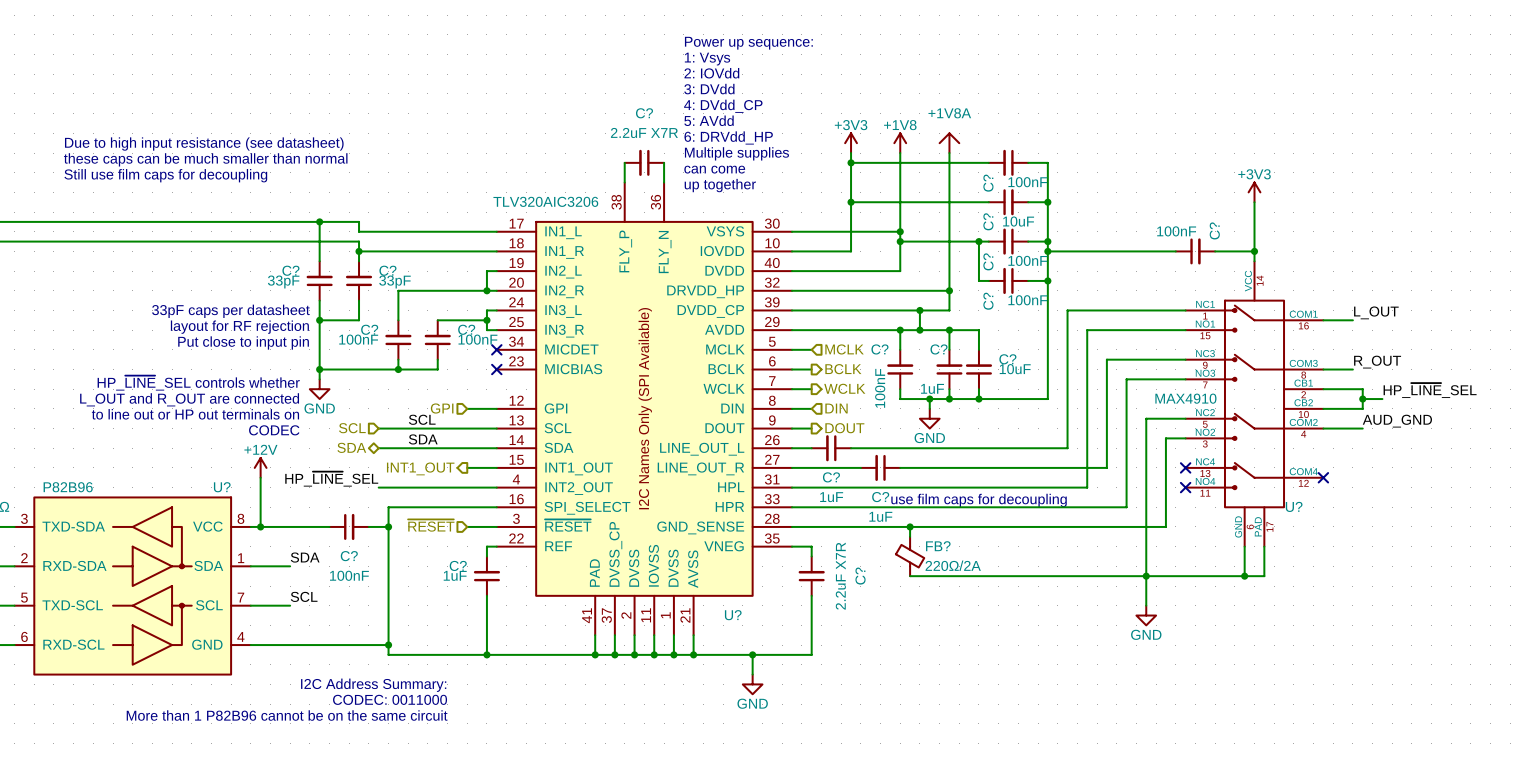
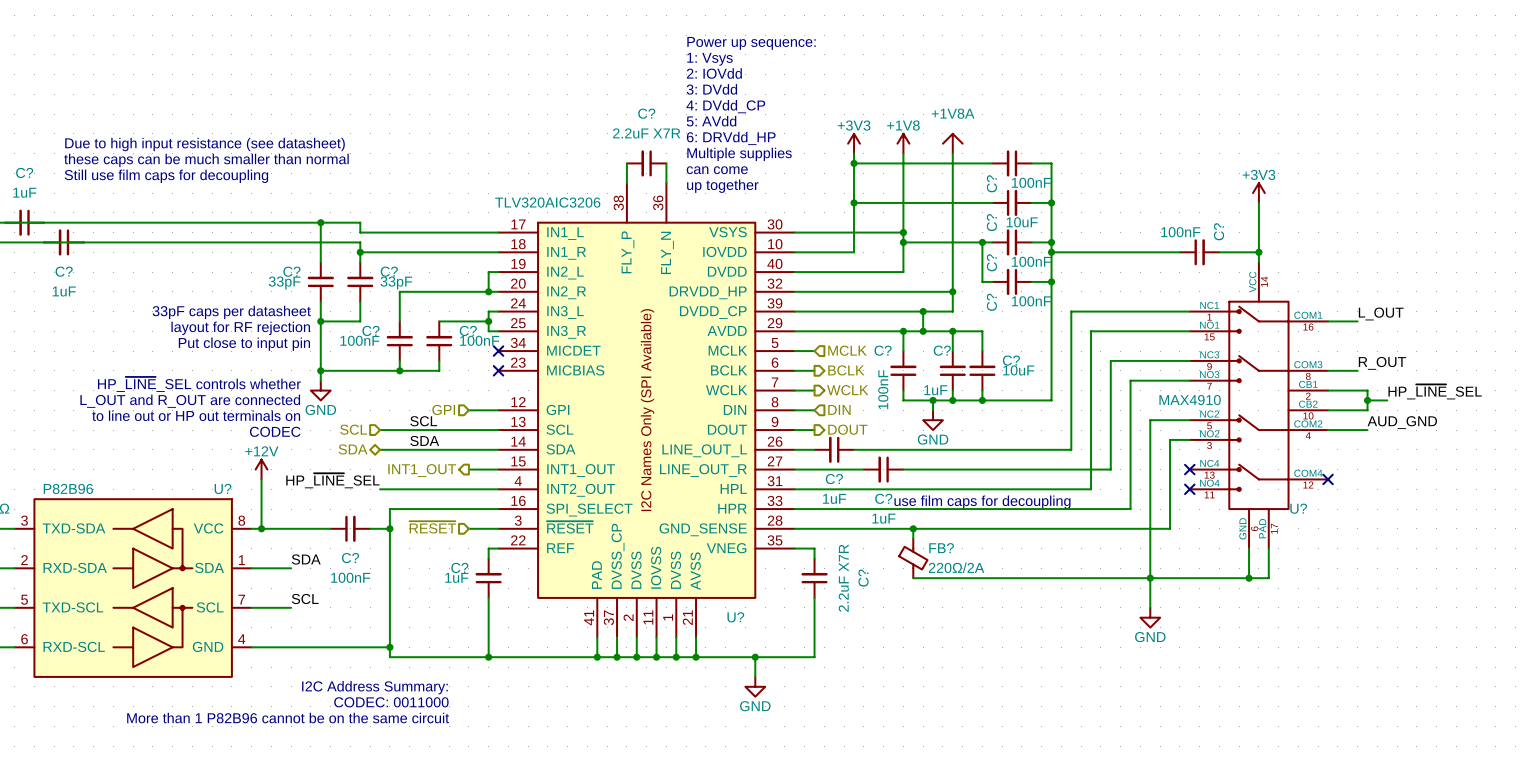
C?: none -> 1uF (24, 222)
C?: none -> 1uF (64, 242)

